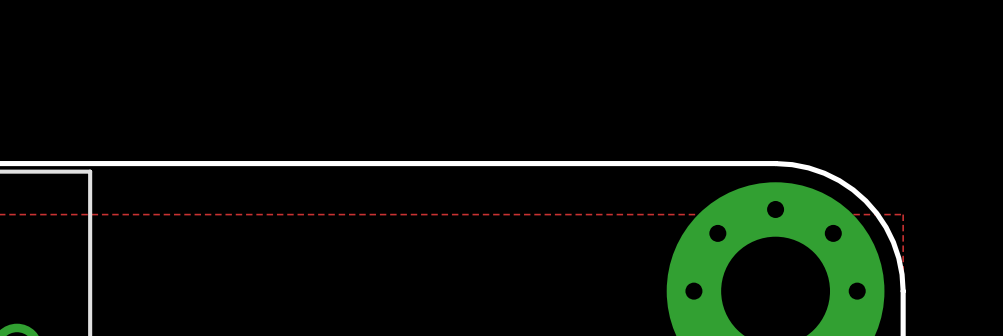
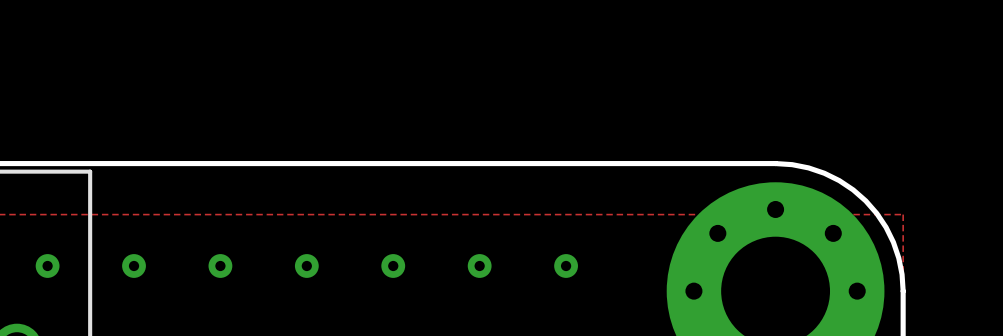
via: none -> (47, 265)
via: none -> (134, 265)
via: none -> (220, 265)
via: none -> (306, 265)
via: none -> (393, 265)
via: none -> (479, 265)
via: none -> (566, 265)

